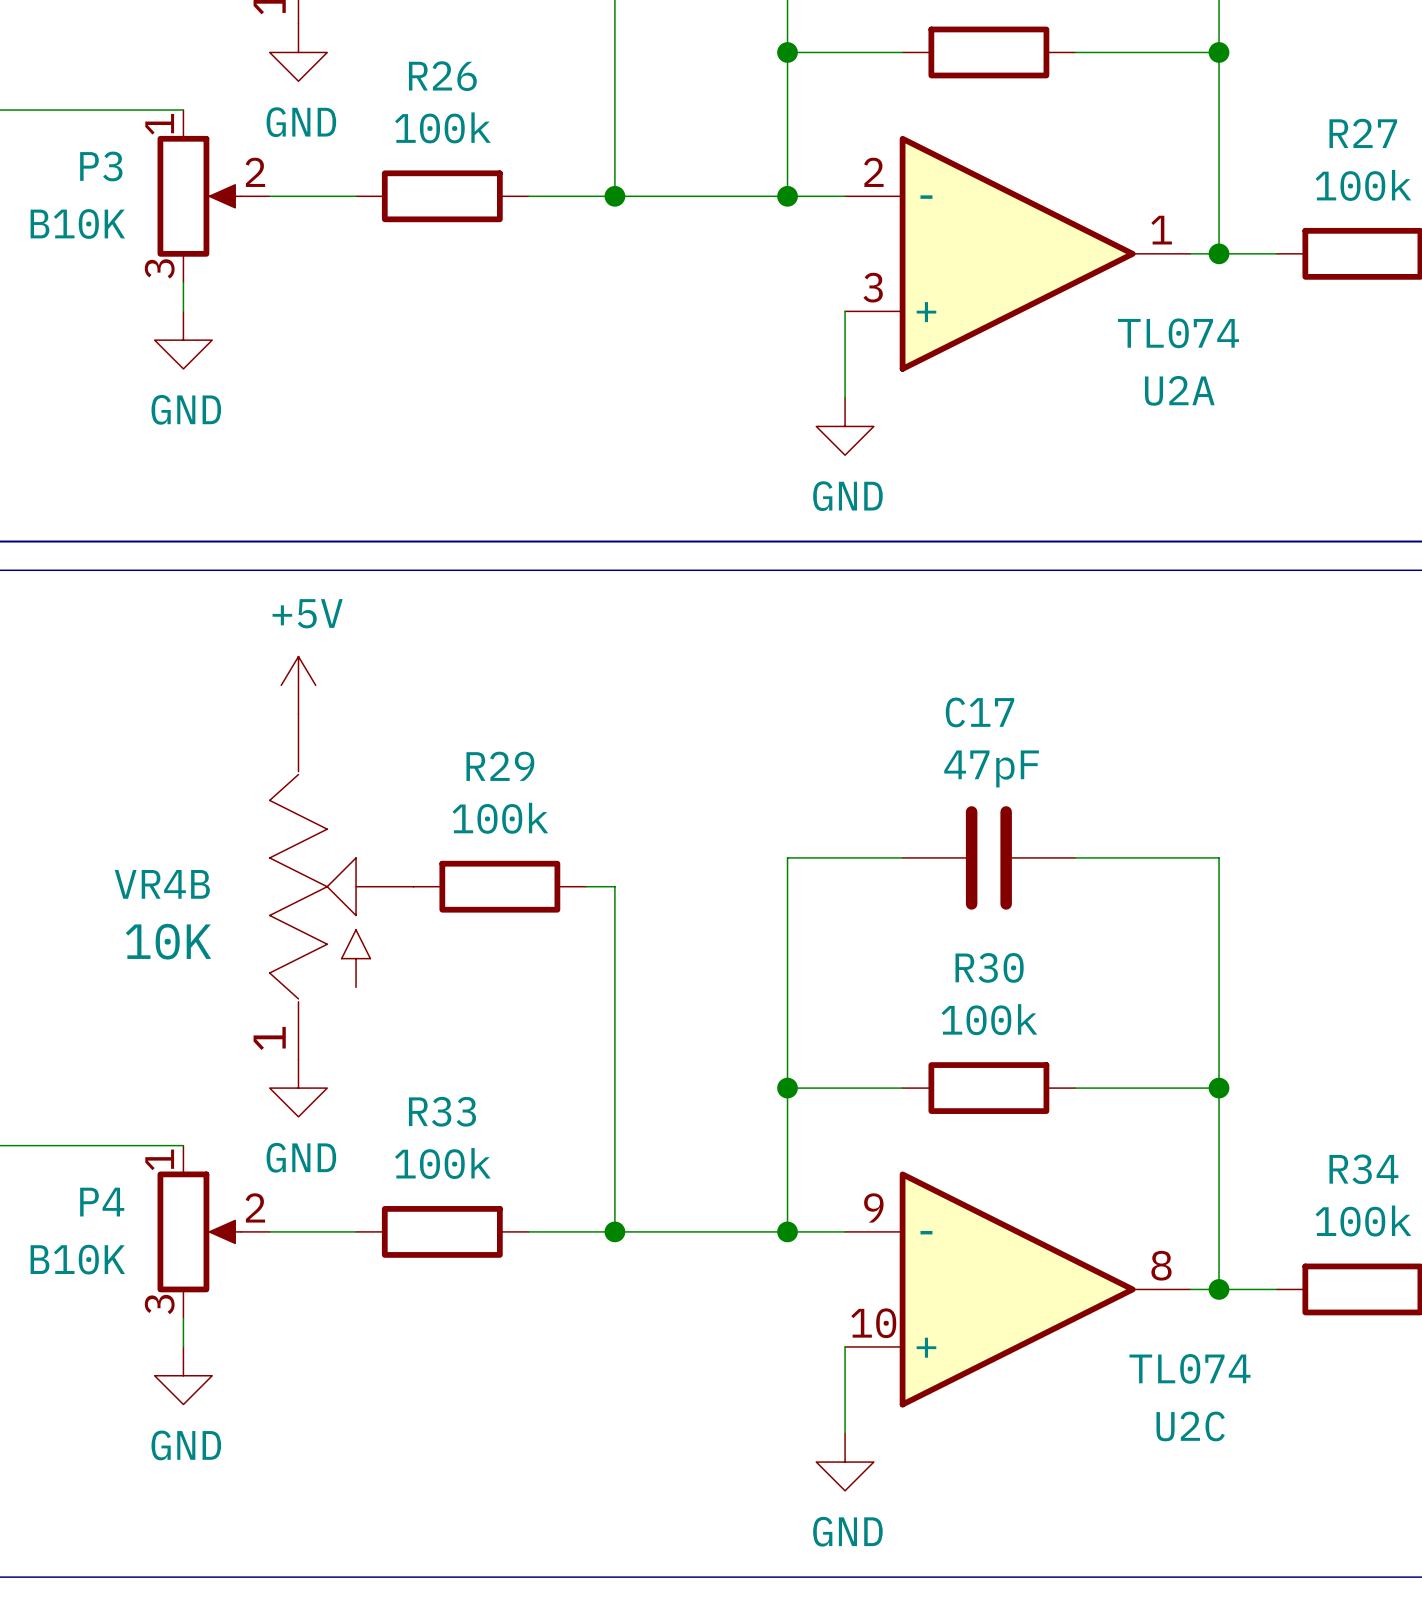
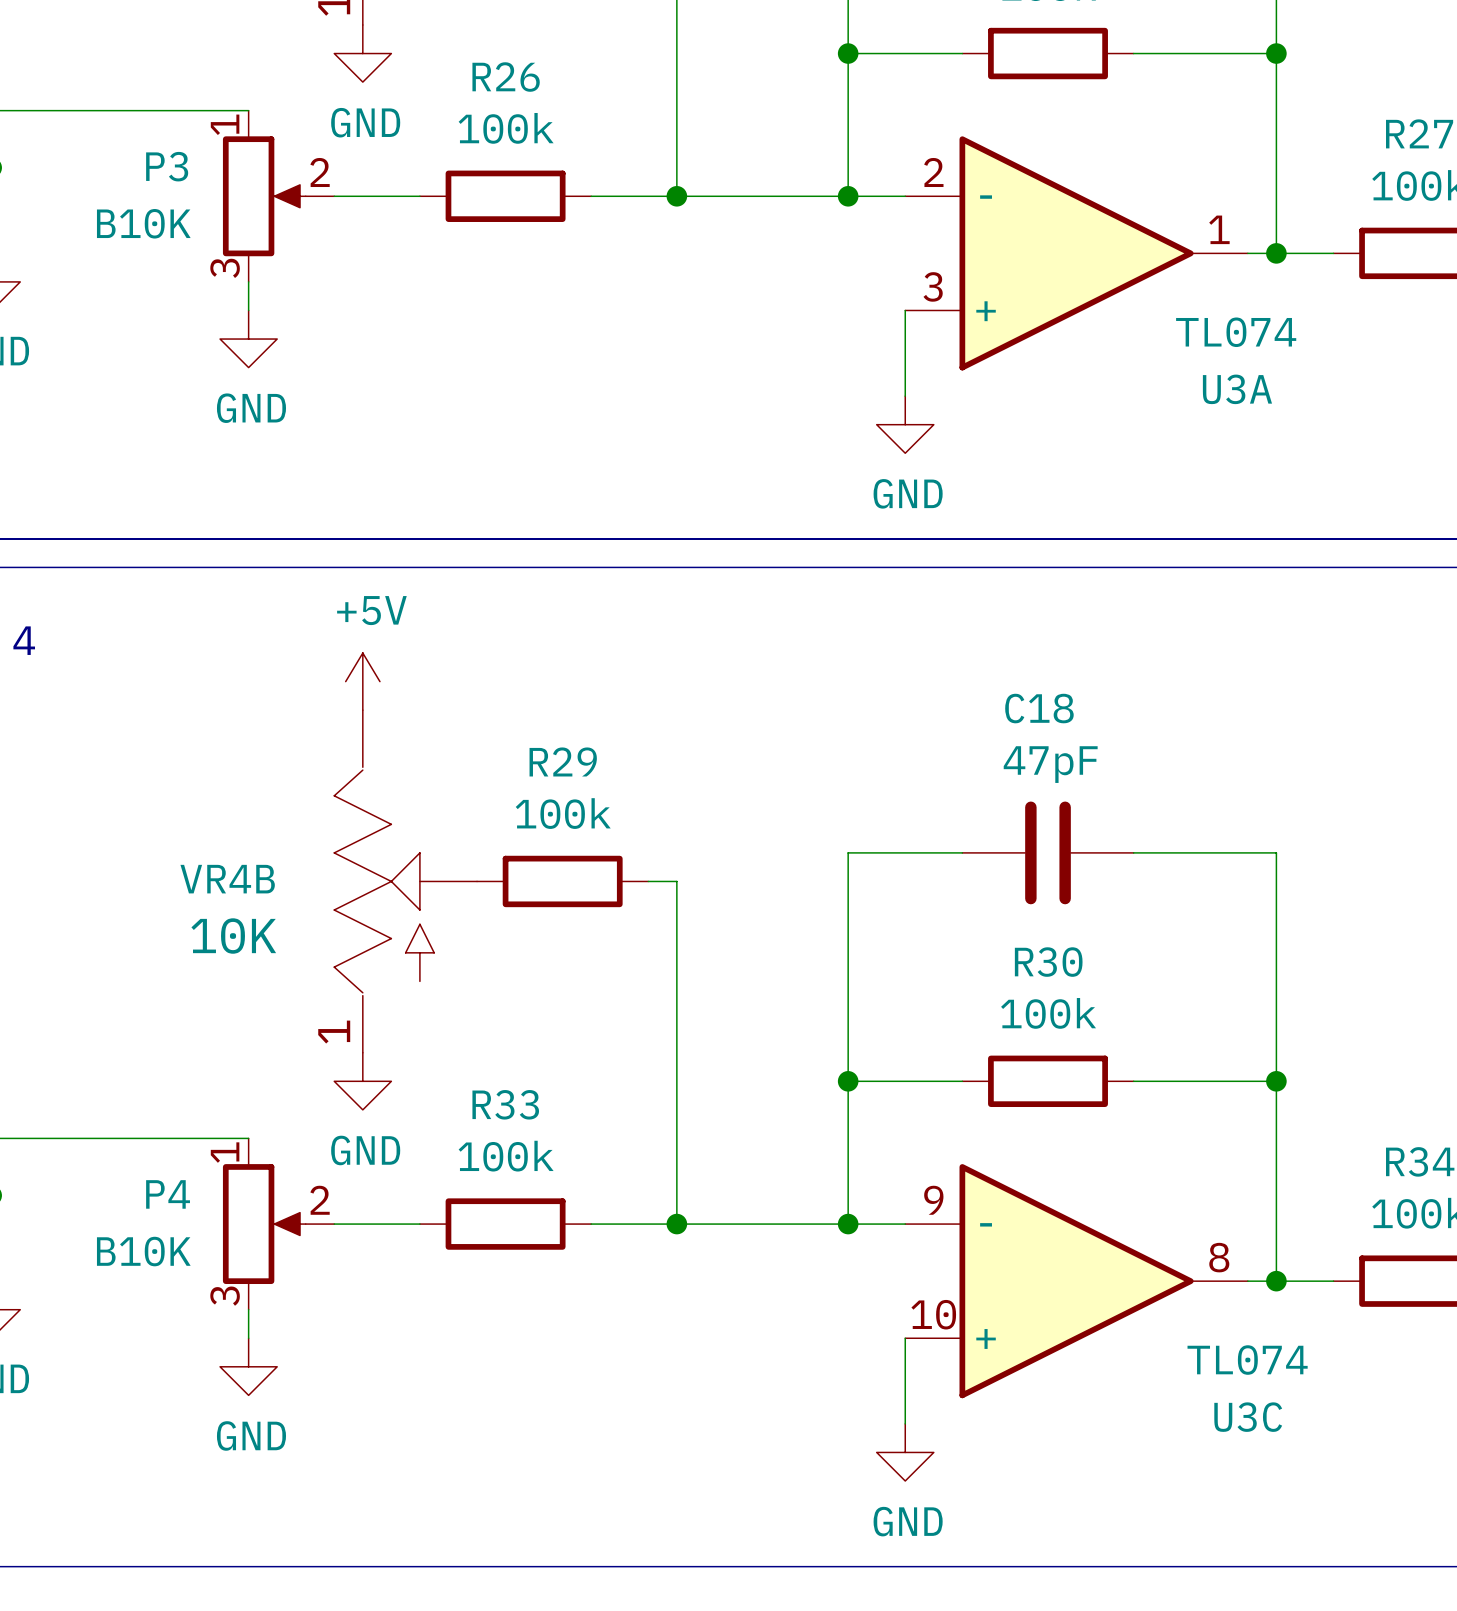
U2A name: U2A (1179, 390) -> U3A (1237, 389)
C17 name: C17 (979, 712) -> C18 (1039, 708)
U2C name: U2C (1190, 1426) -> U3C (1248, 1417)

